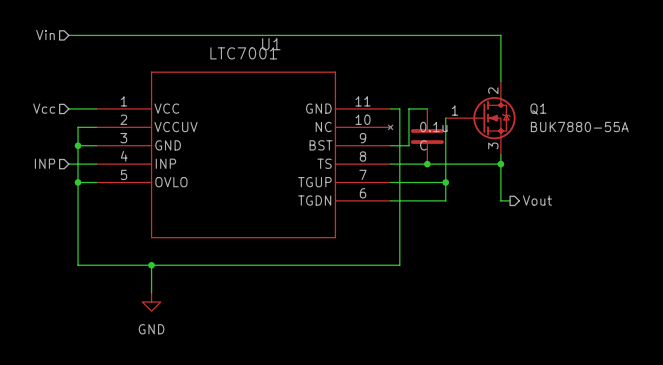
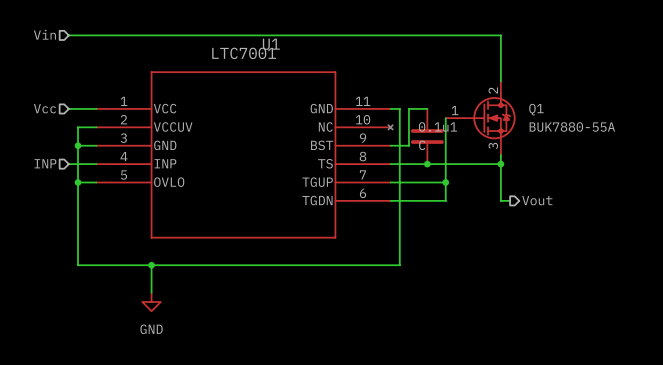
0.1u name: 0.1u (433, 126) -> 0.1u1 (437, 126)

